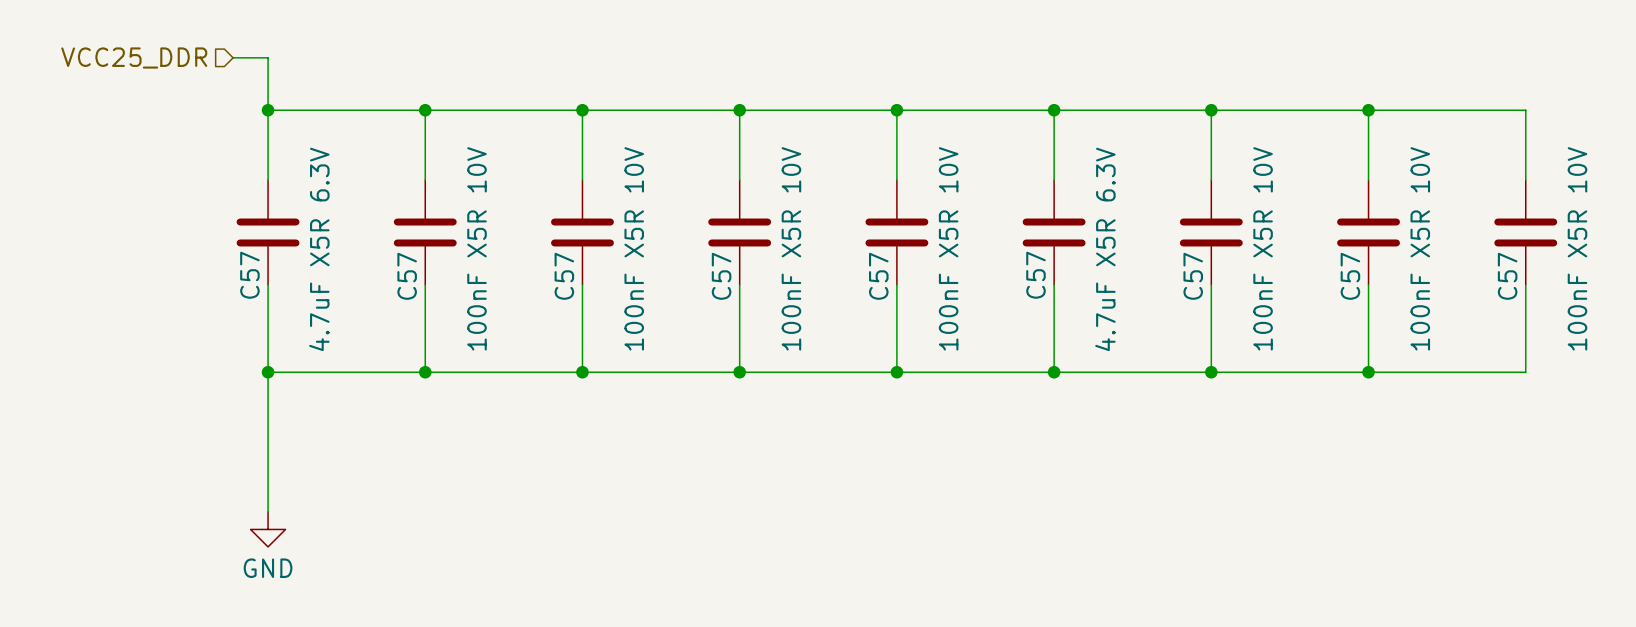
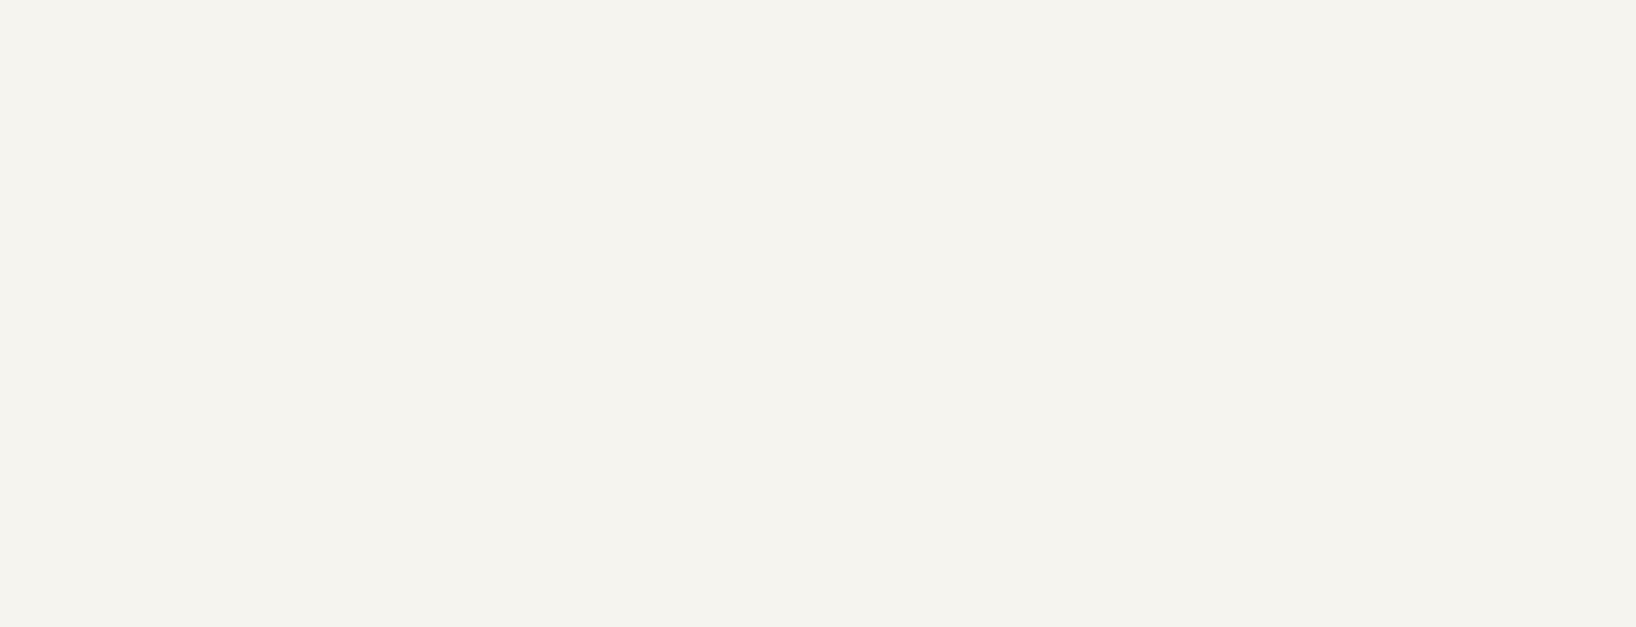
wire: (233, 57) (268, 57) (268, 180) -> none
hierarchical label: VCC25_DDR (134, 58) -> none
wire: (268, 110) (1525, 110) (1525, 180) -> none
junction: (268, 110) -> none
wire: (425, 110) (425, 180) -> none
junction: (425, 110) -> none
wire: (582, 110) (582, 180) -> none
junction: (582, 110) -> none
wire: (739, 110) (739, 180) -> none
junction: (739, 110) -> none
wire: (896, 110) (896, 180) -> none
junction: (896, 110) -> none
wire: (1054, 110) (1054, 180) -> none
junction: (1054, 110) -> none
wire: (1211, 110) (1211, 180) -> none
junction: (1211, 110) -> none
wire: (1368, 110) (1368, 180) -> none
junction: (1368, 110) -> none
C57: 4.7uF X5R 6.3V (268, 232) -> none
C57: 100nF X5R 10V (425, 232) -> none
C57: 100nF X5R 10V (582, 232) -> none
C57: 100nF X5R 10V (739, 232) -> none
C57: 100nF X5R 10V (896, 232) -> none
C57: 4.7uF X5R 6.3V (1054, 232) -> none
C57: 100nF X5R 10V (1211, 232) -> none
C57: 100nF X5R 10V (1368, 232) -> none
C57: 100nF X5R 10V (1525, 232) -> none
wire: (268, 284) (268, 511) -> none
wire: (425, 284) (425, 372) -> none
wire: (582, 284) (582, 372) -> none
wire: (739, 284) (739, 372) -> none
wire: (896, 284) (896, 372) -> none
wire: (1054, 284) (1054, 372) -> none
wire: (1211, 284) (1211, 372) -> none
wire: (1368, 284) (1368, 372) -> none
wire: (1525, 284) (1525, 372) (268, 372) -> none
junction: (268, 372) -> none
junction: (425, 372) -> none
junction: (582, 372) -> none
junction: (739, 372) -> none
junction: (896, 372) -> none
junction: (1054, 372) -> none
junction: (1211, 372) -> none
junction: (1368, 372) -> none
power symbol: GND (268, 529) -> none

